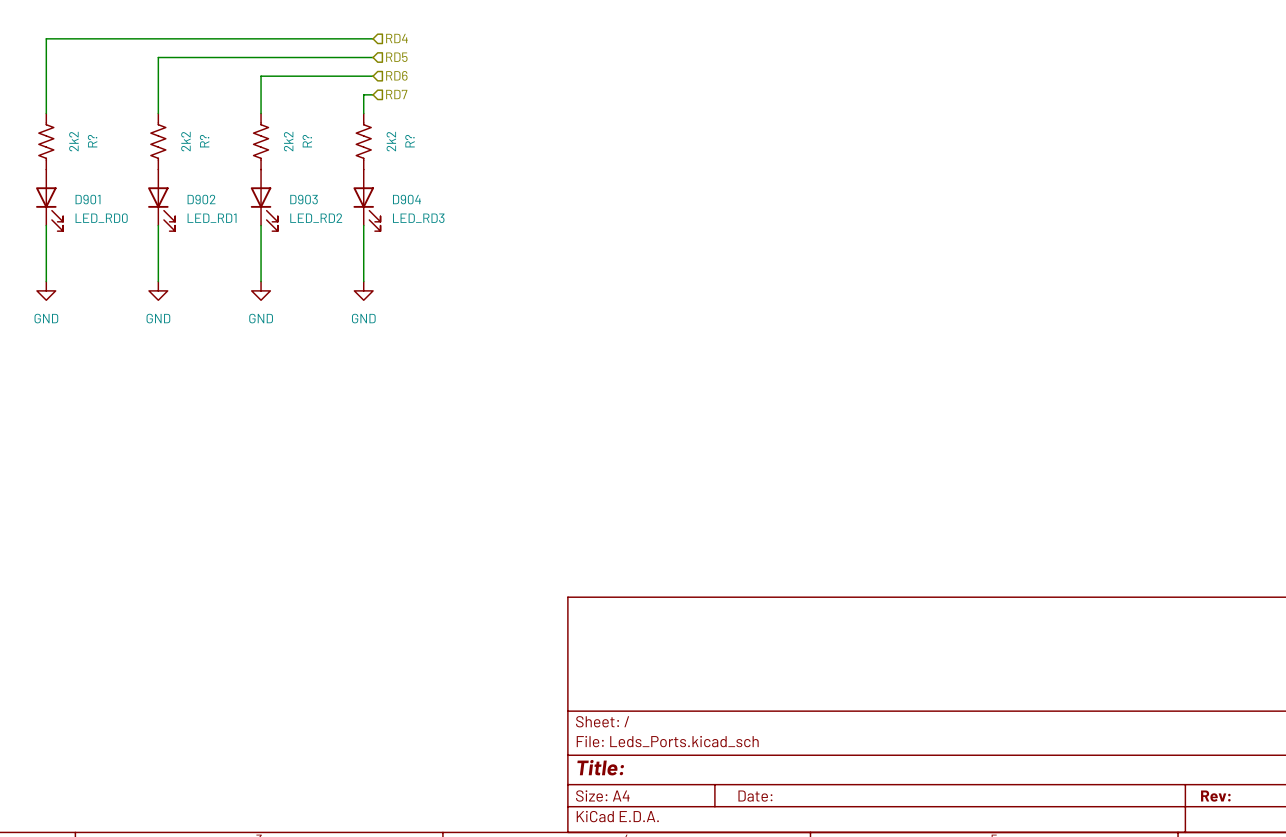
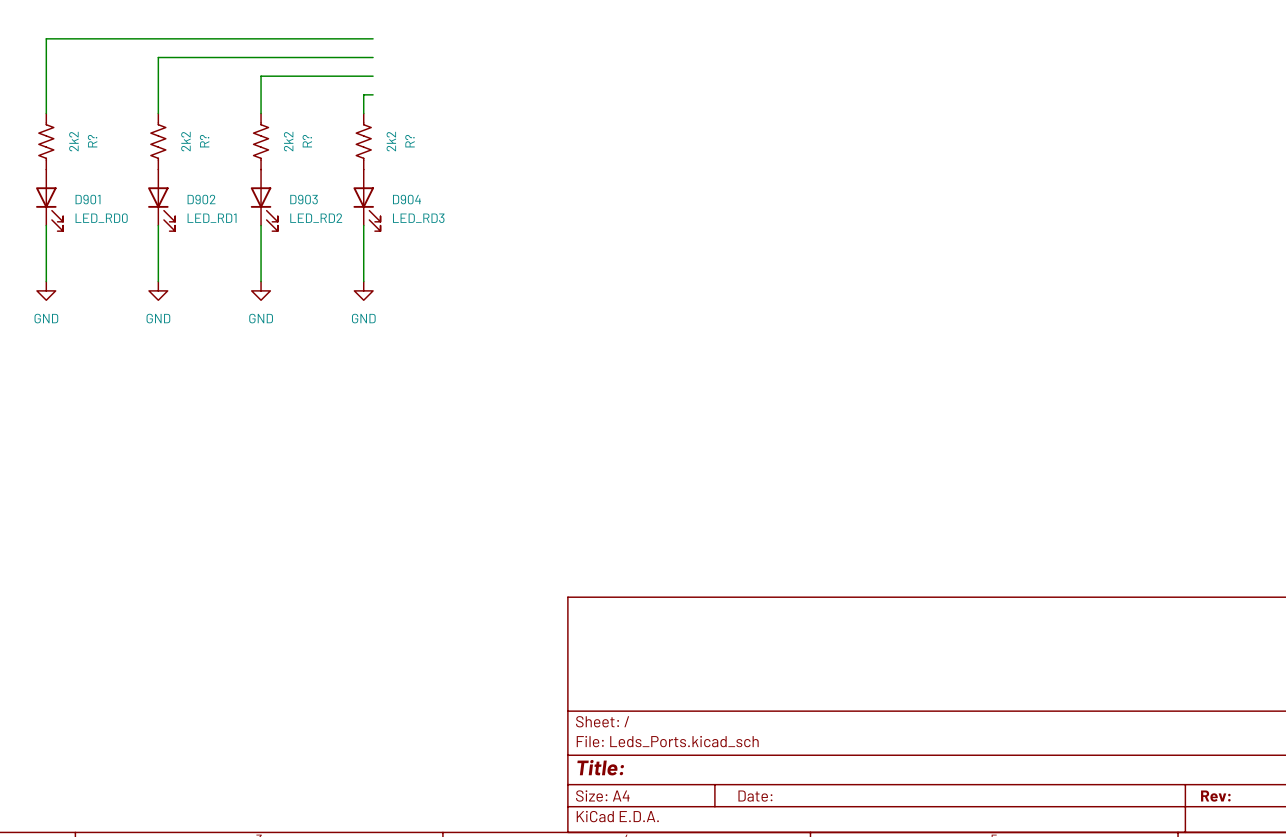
hierarchical label: RD4 (397, 38) -> none
hierarchical label: RD5 (396, 57) -> none
hierarchical label: RD6 (396, 75) -> none
hierarchical label: RD7 (396, 94) -> none

